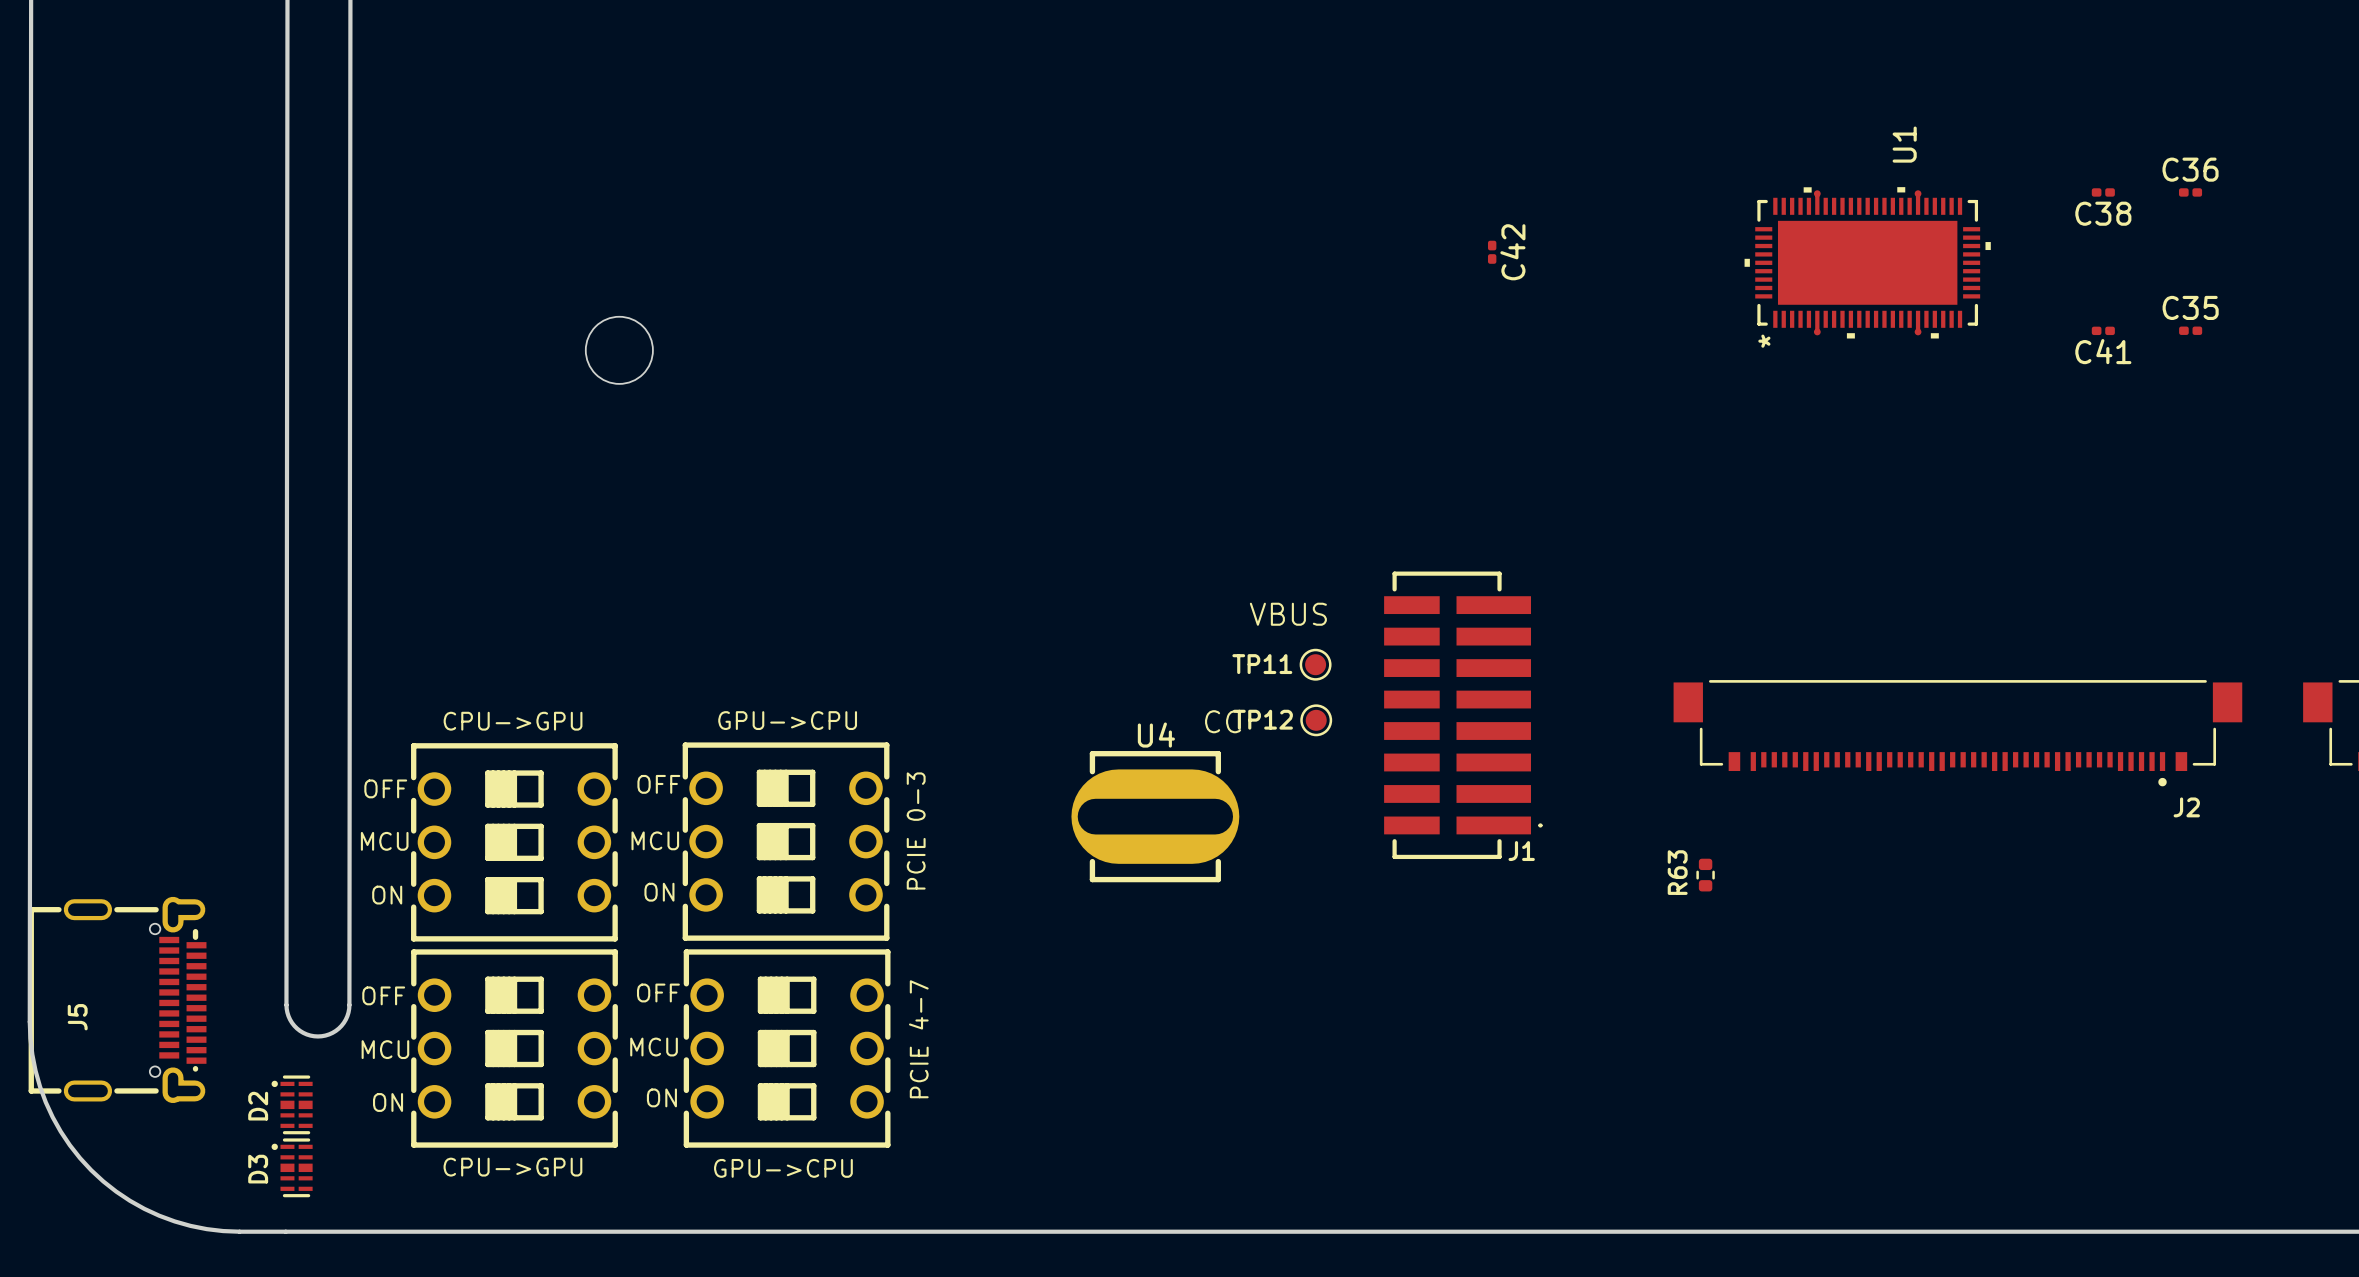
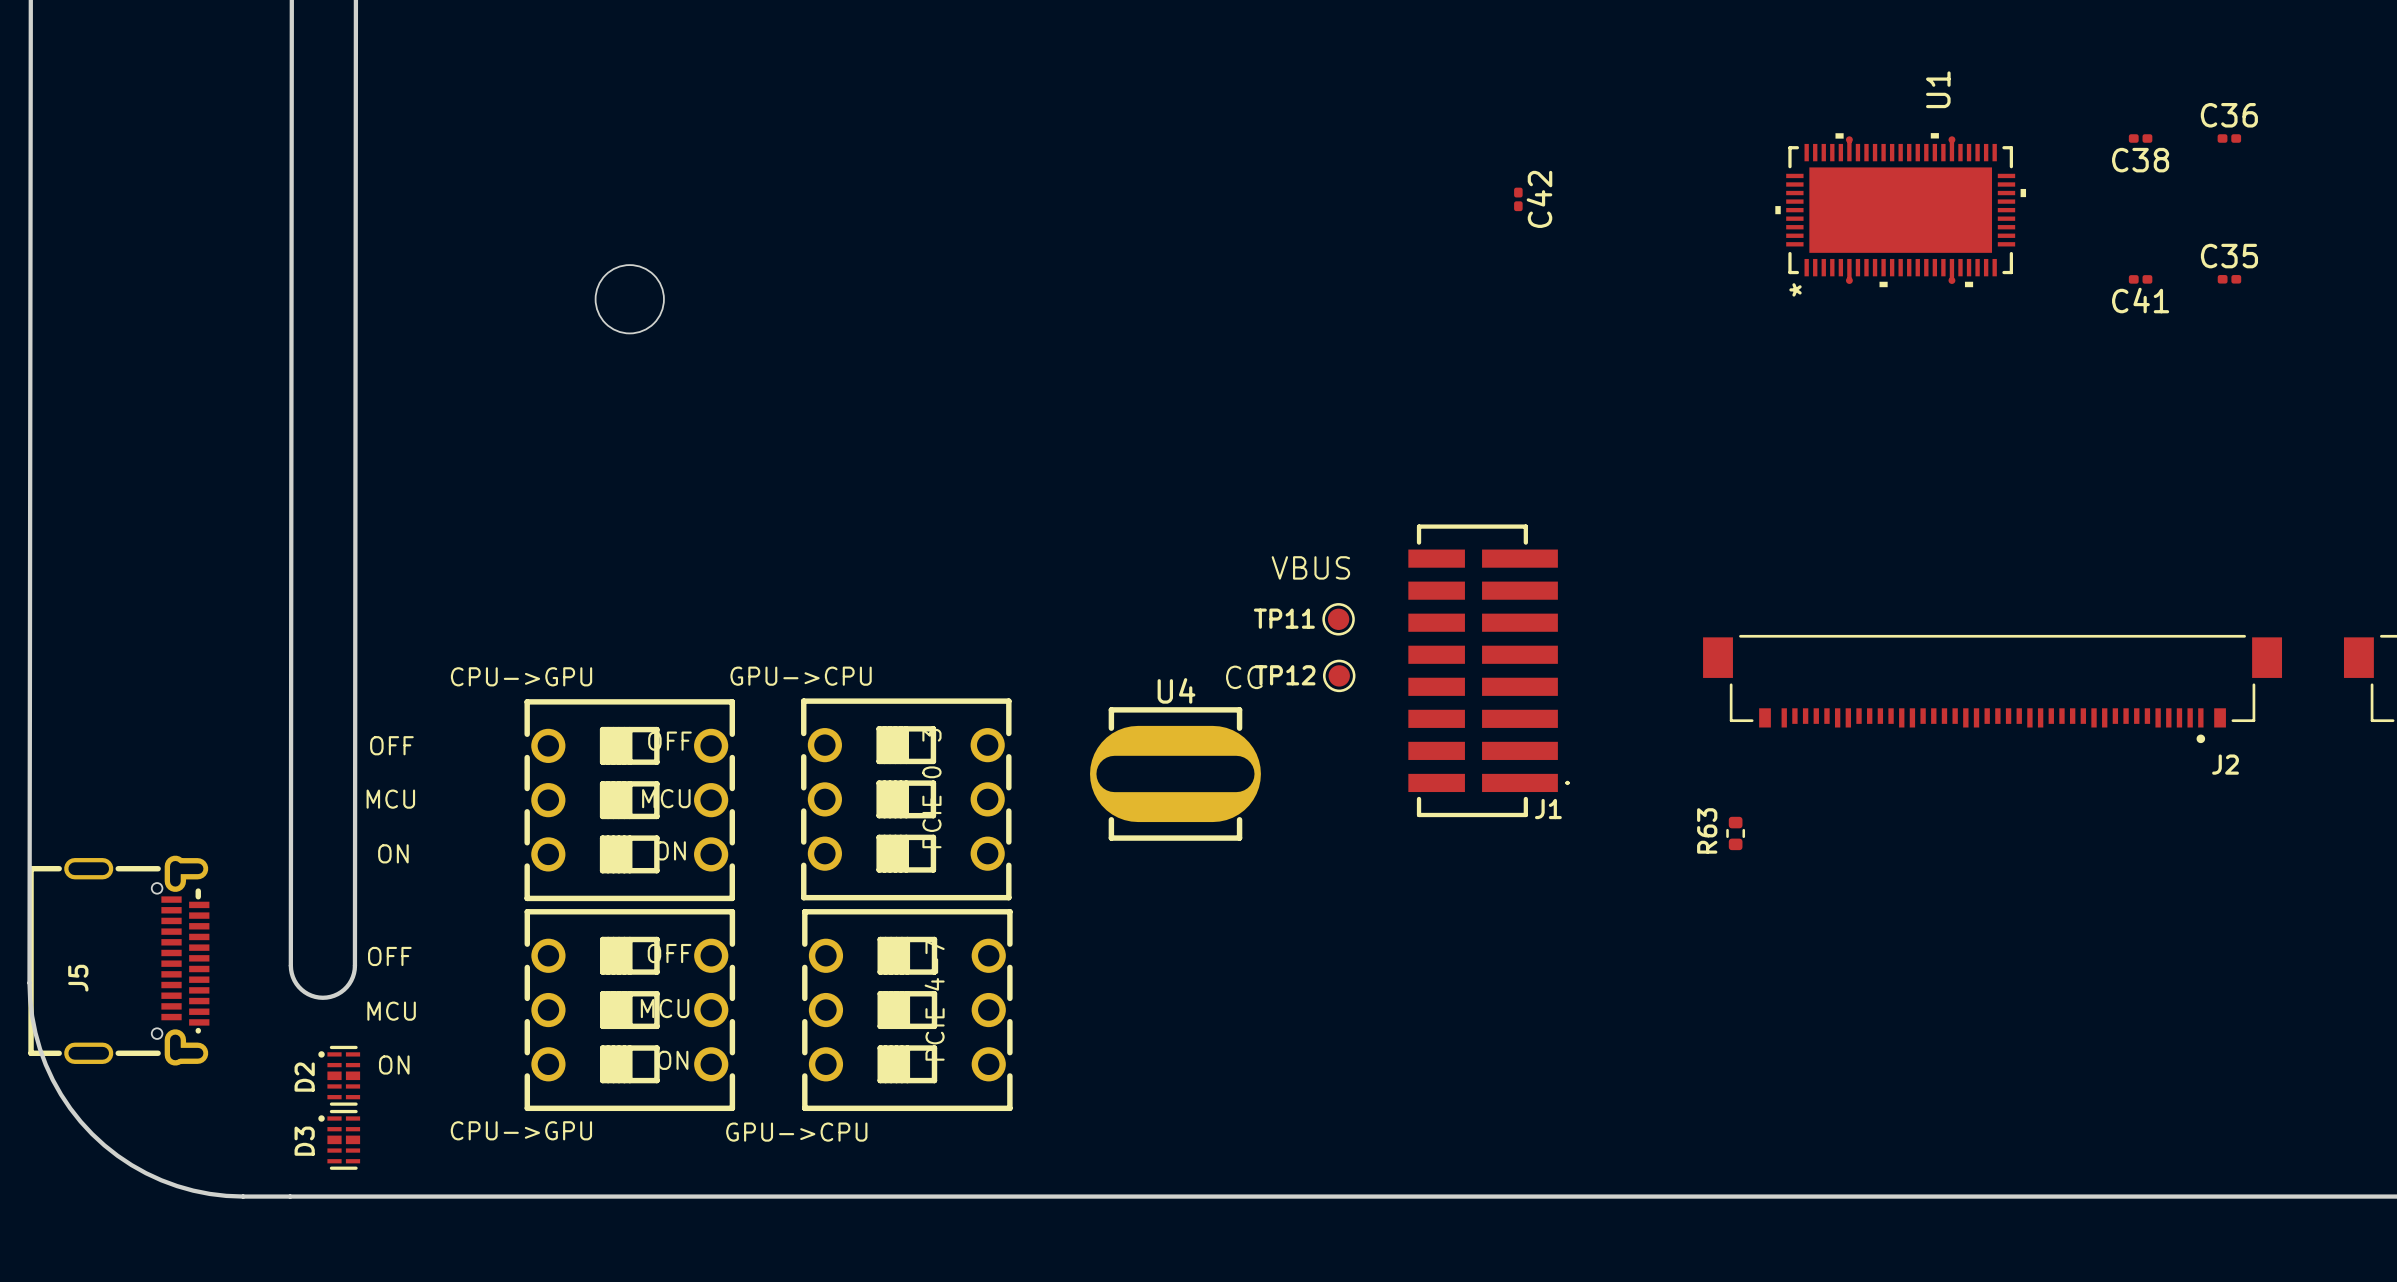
part: (786, 841) -> none
part: none -> (906, 799)
part: (514, 842) -> none
part: none -> (629, 800)
part: (514, 1048) -> none
part: none -> (629, 1010)
part: (787, 1048) -> none
part: none -> (907, 1010)
D2 position: (292, 1104) -> (339, 1075)
D3 position: (292, 1167) -> (339, 1139)

